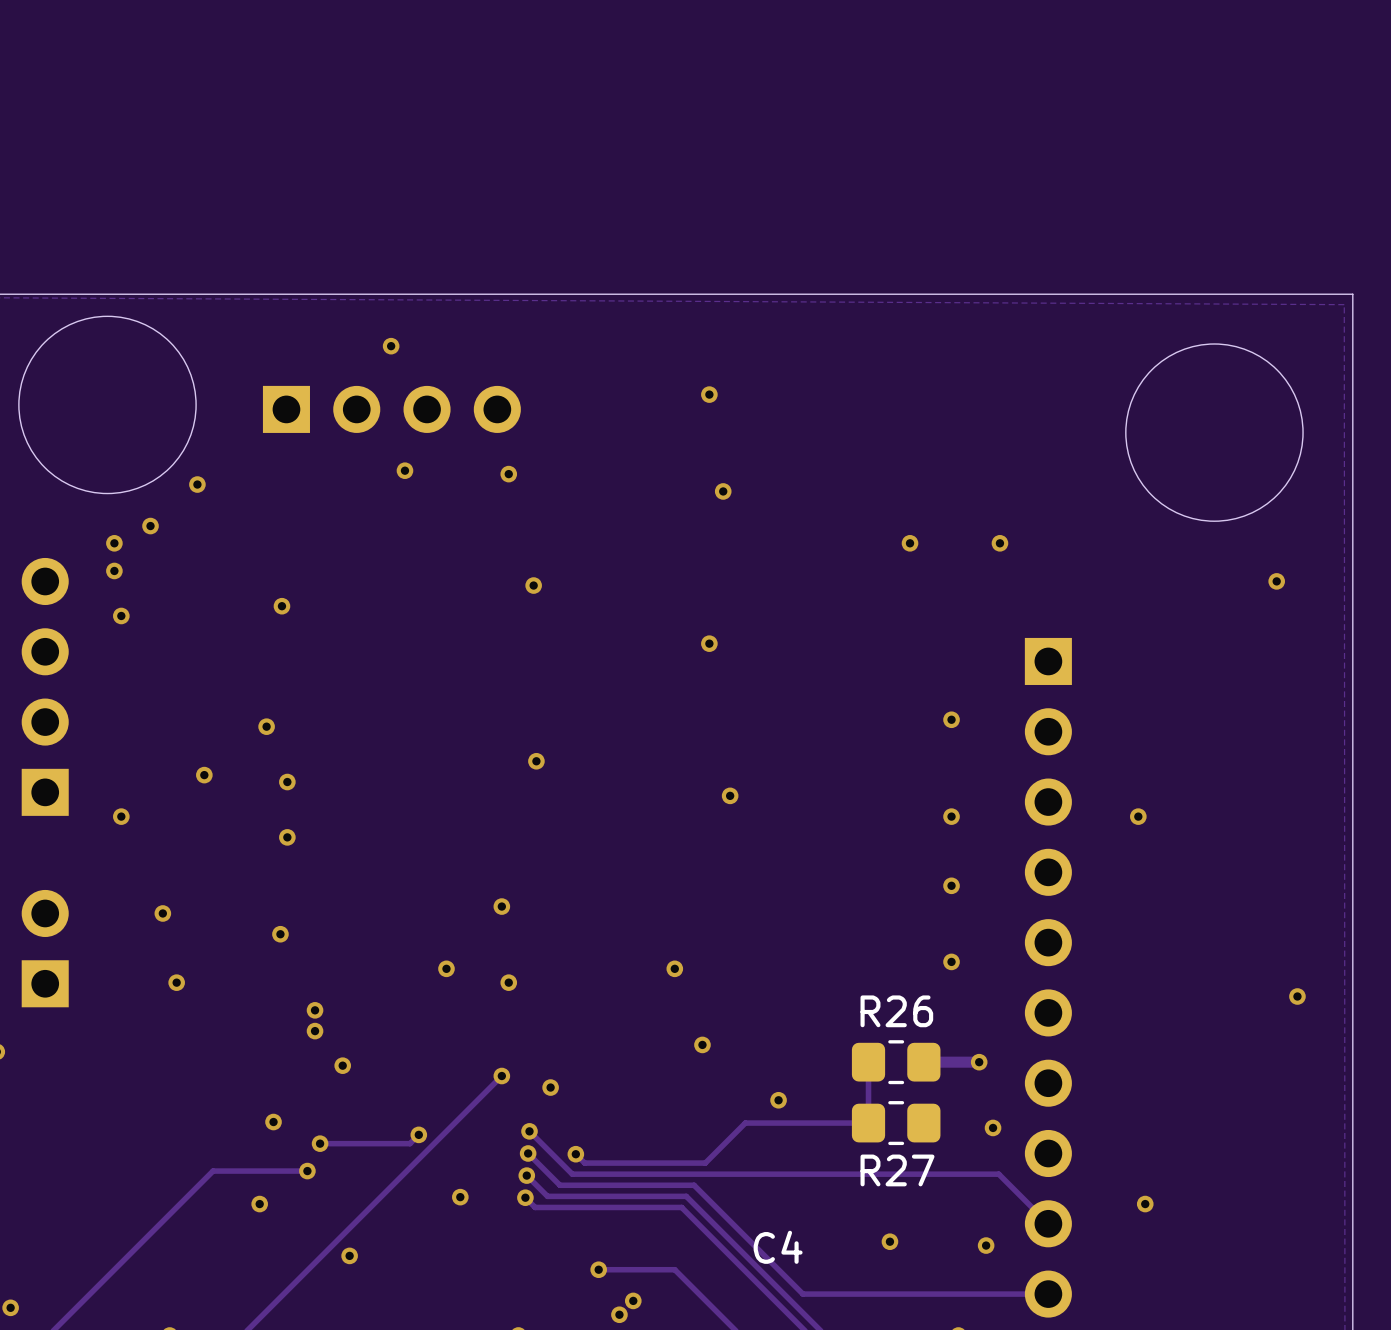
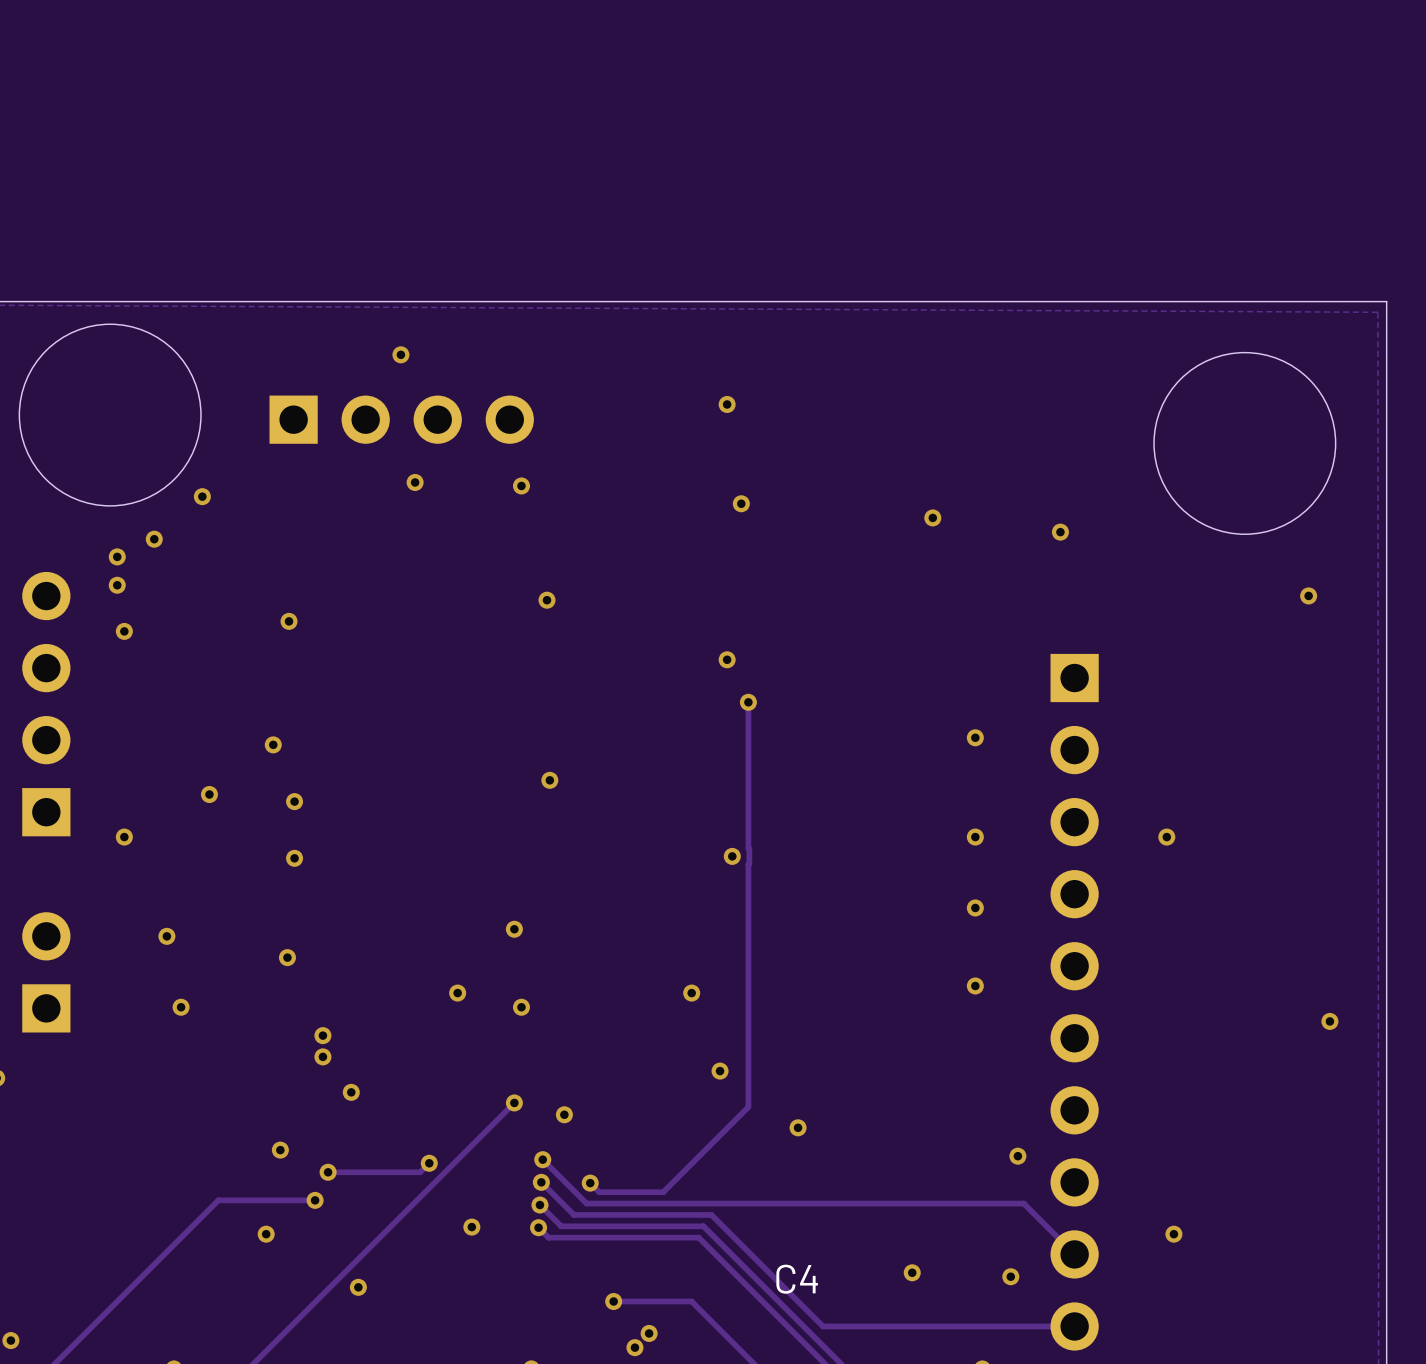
via position: (910, 543) -> (932, 517)
via position: (999, 543) -> (1060, 532)
via: none -> (748, 702)
via position: (730, 795) -> (732, 856)
track: (868, 1062) (868, 1123) (745, 1123) (705, 1163) (647, 1163) -> (748, 702) (748, 1107) (663, 1192)
R26: (896, 1062) -> none
track: (979, 1062) (923, 1062) -> none
via: (979, 1062) -> none
R27: (896, 1123) -> none

